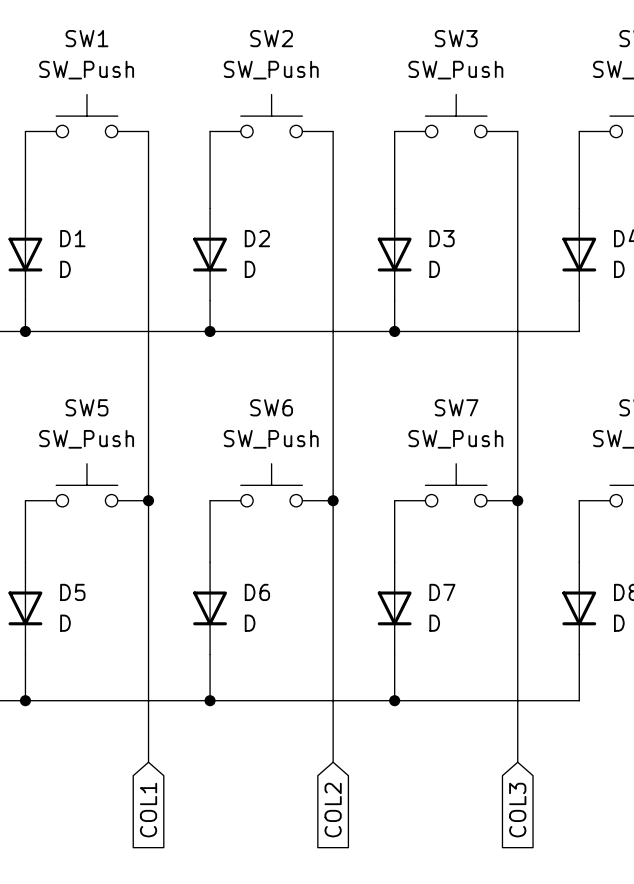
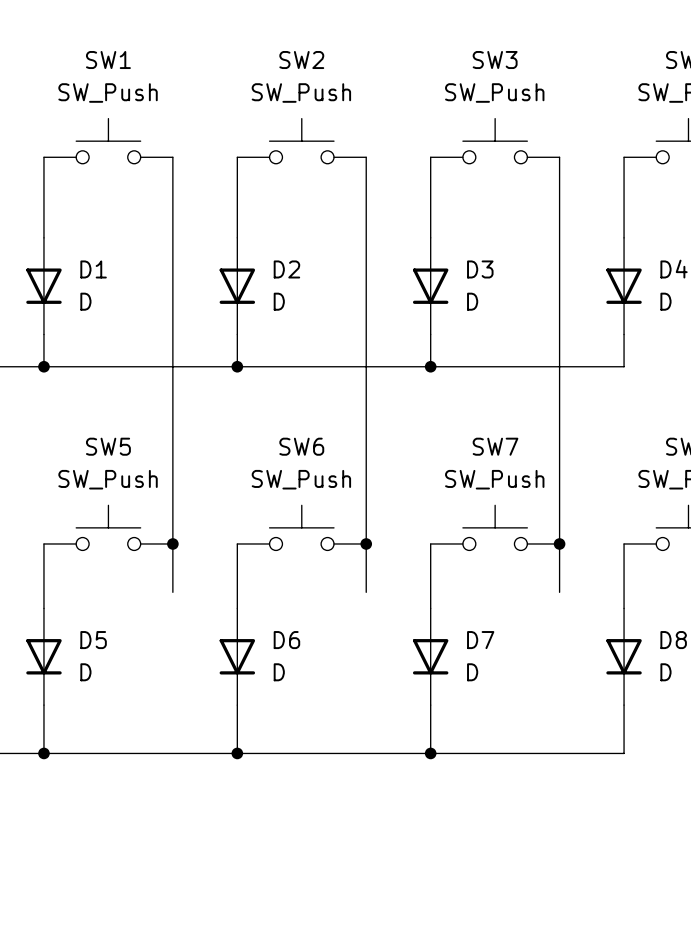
wire: (148, 546) (148, 762) -> none
wire: (333, 546) (333, 762) -> none
wire: (517, 546) (517, 762) -> none
global label: COL1 (148, 810) -> none
global label: COL2 (333, 810) -> none
global label: COL3 (517, 810) -> none

